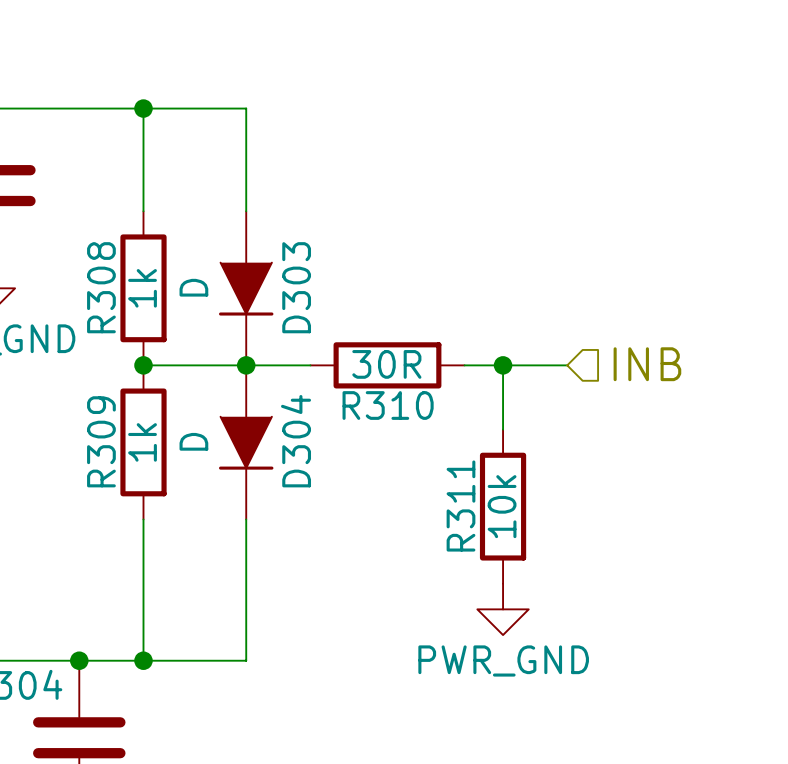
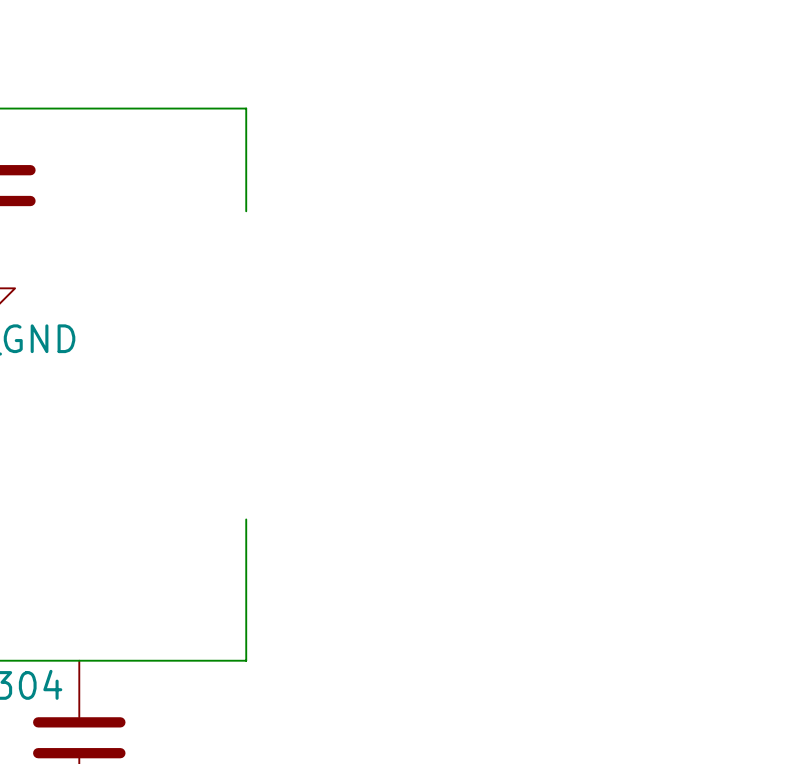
wire: (143, 108) (143, 211) -> none
junction: (143, 108) -> none
R308: 1k (143, 288) -> none
D303: D (246, 288) -> none
hierarchical label: INB (647, 364) -> none
wire: (143, 365) (310, 365) -> none
junction: (143, 365) -> none
junction: (246, 365) -> none
R310: 30R (387, 365) -> none
wire: (464, 365) (567, 365) -> none
wire: (503, 365) (503, 429) -> none
junction: (503, 365) -> none
R309: 1k (143, 442) -> none
D304: D (246, 442) -> none
R311: 10k (503, 506) -> none
wire: (143, 519) (143, 660) -> none
power symbol: PWR_GND (503, 609) -> none
junction: (79, 660) -> none
junction: (143, 660) -> none

